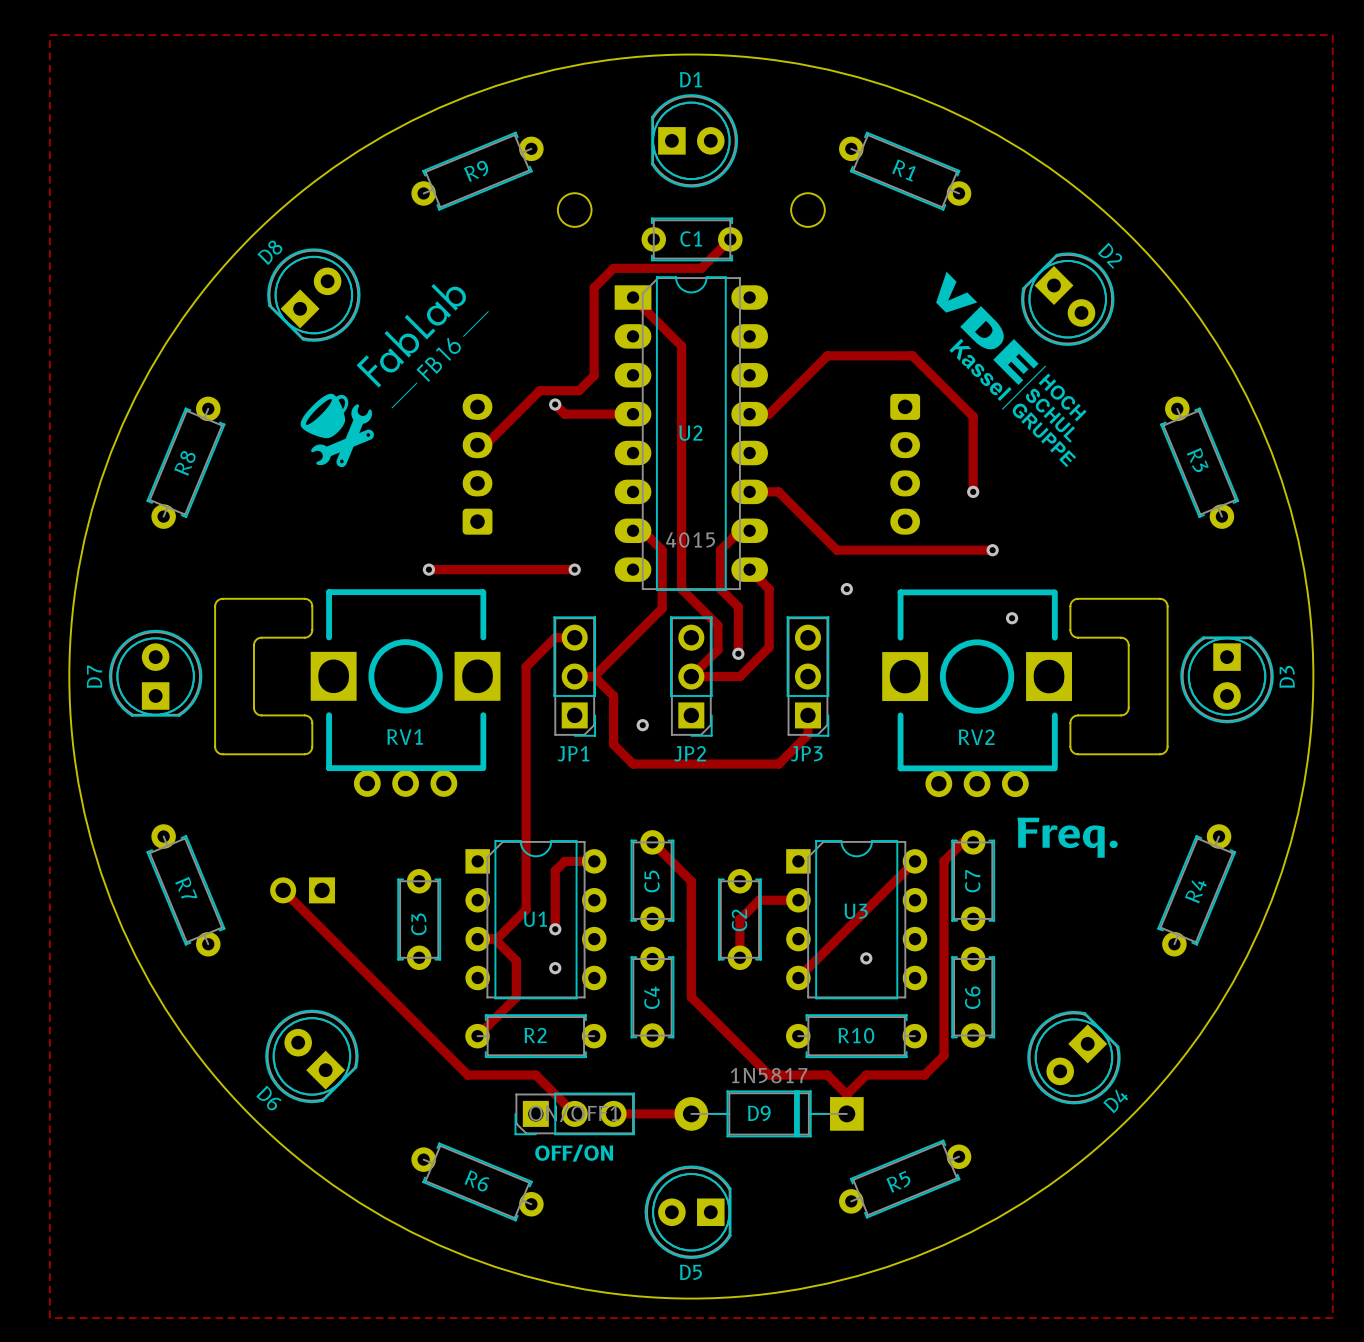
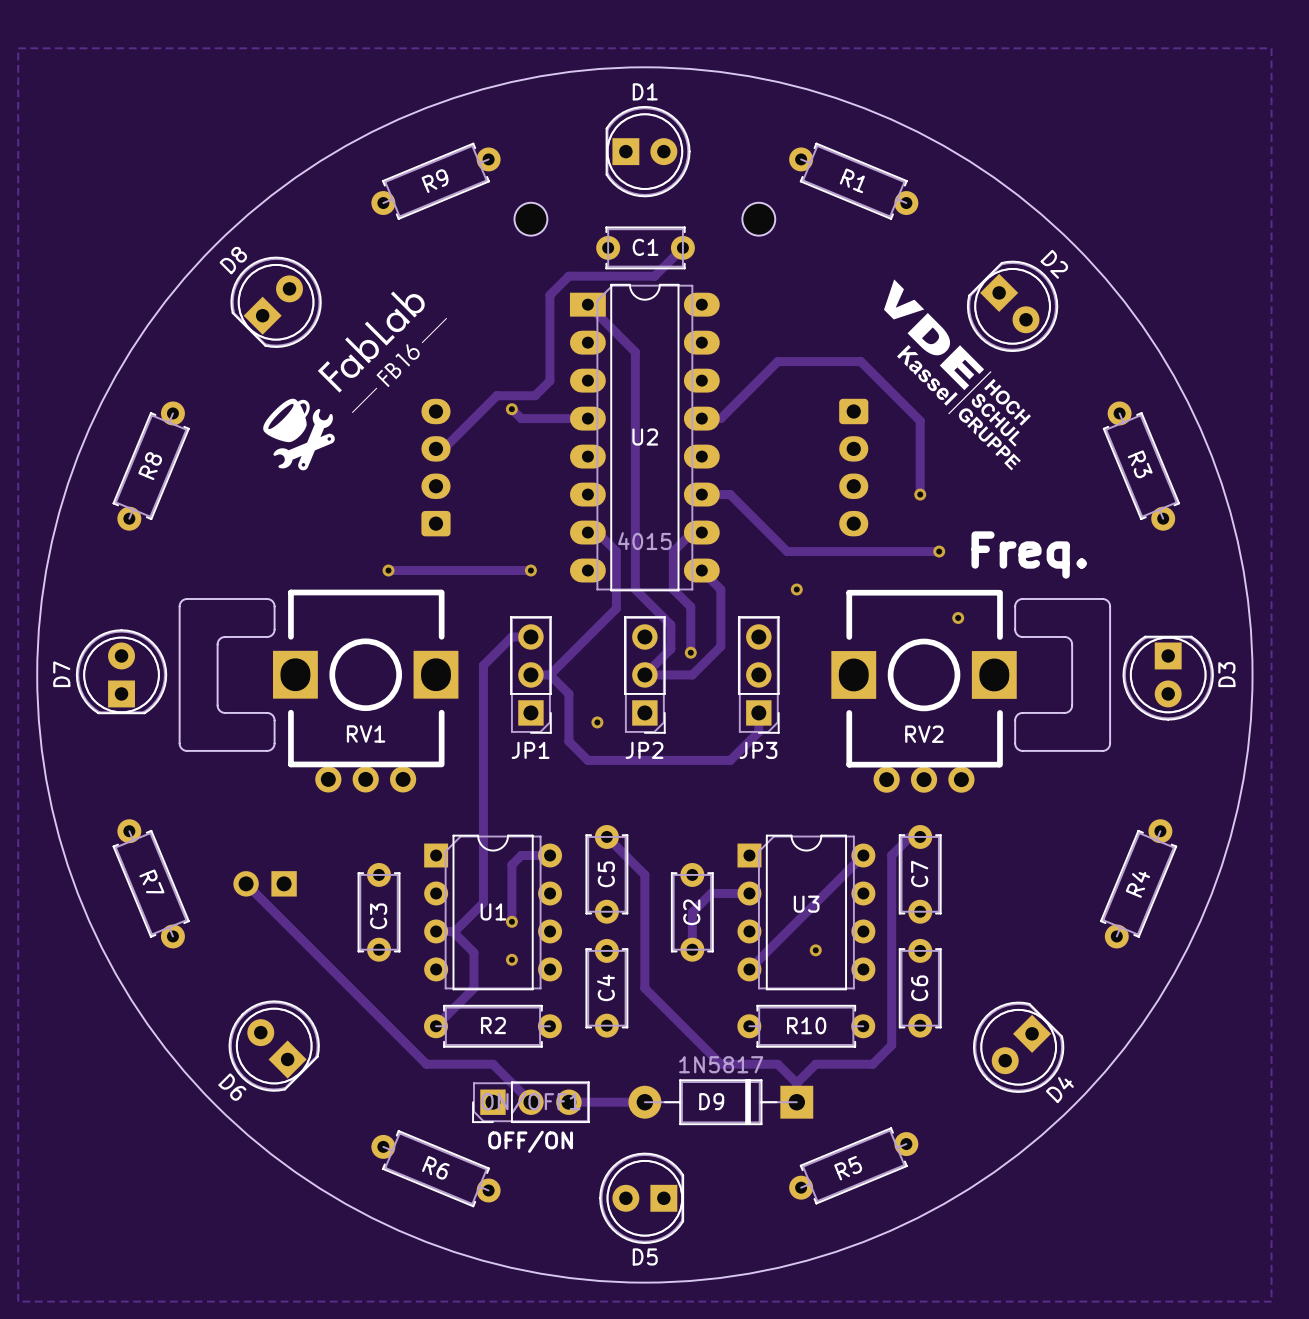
text position: Freq. (1067, 837) -> Freq. (1029, 554)

